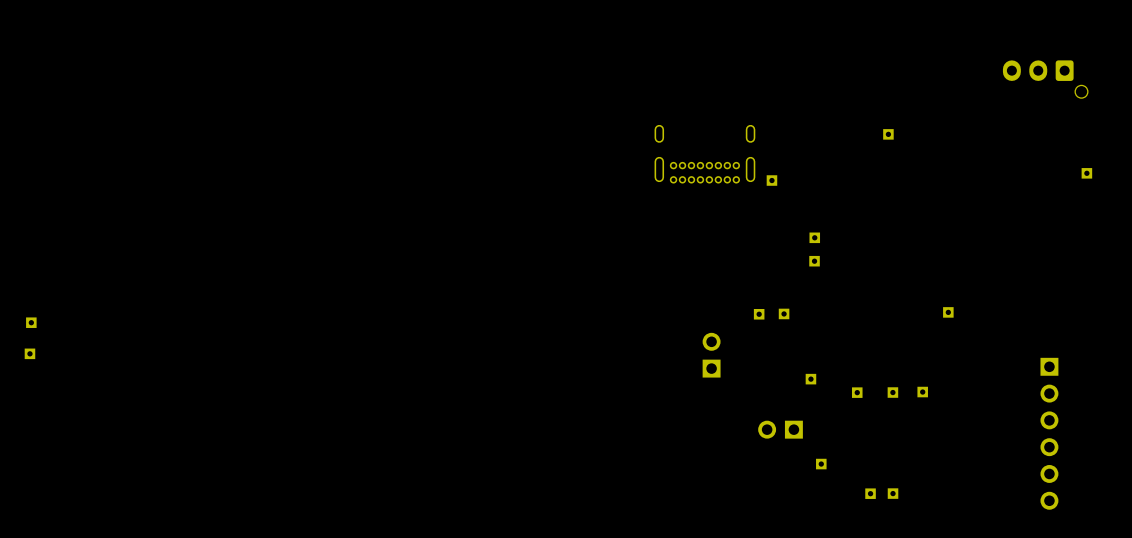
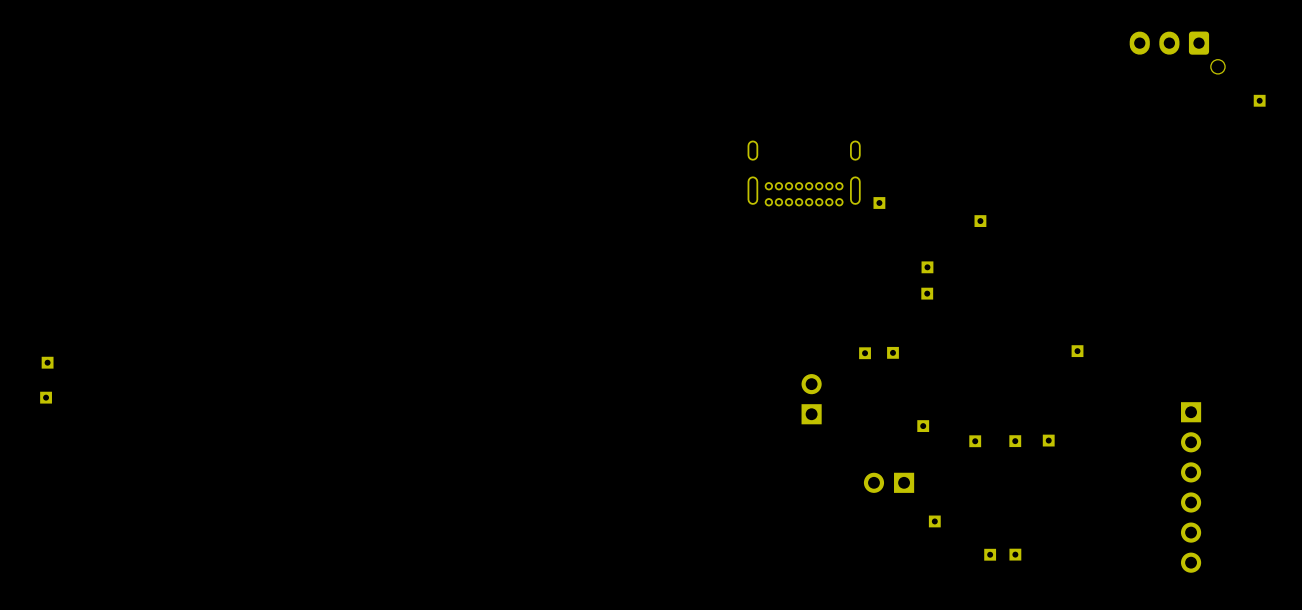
part position: (1045, 79) -> (1177, 52)
part position: (888, 134) -> (980, 221)
part position: (1086, 173) -> (1259, 100)

